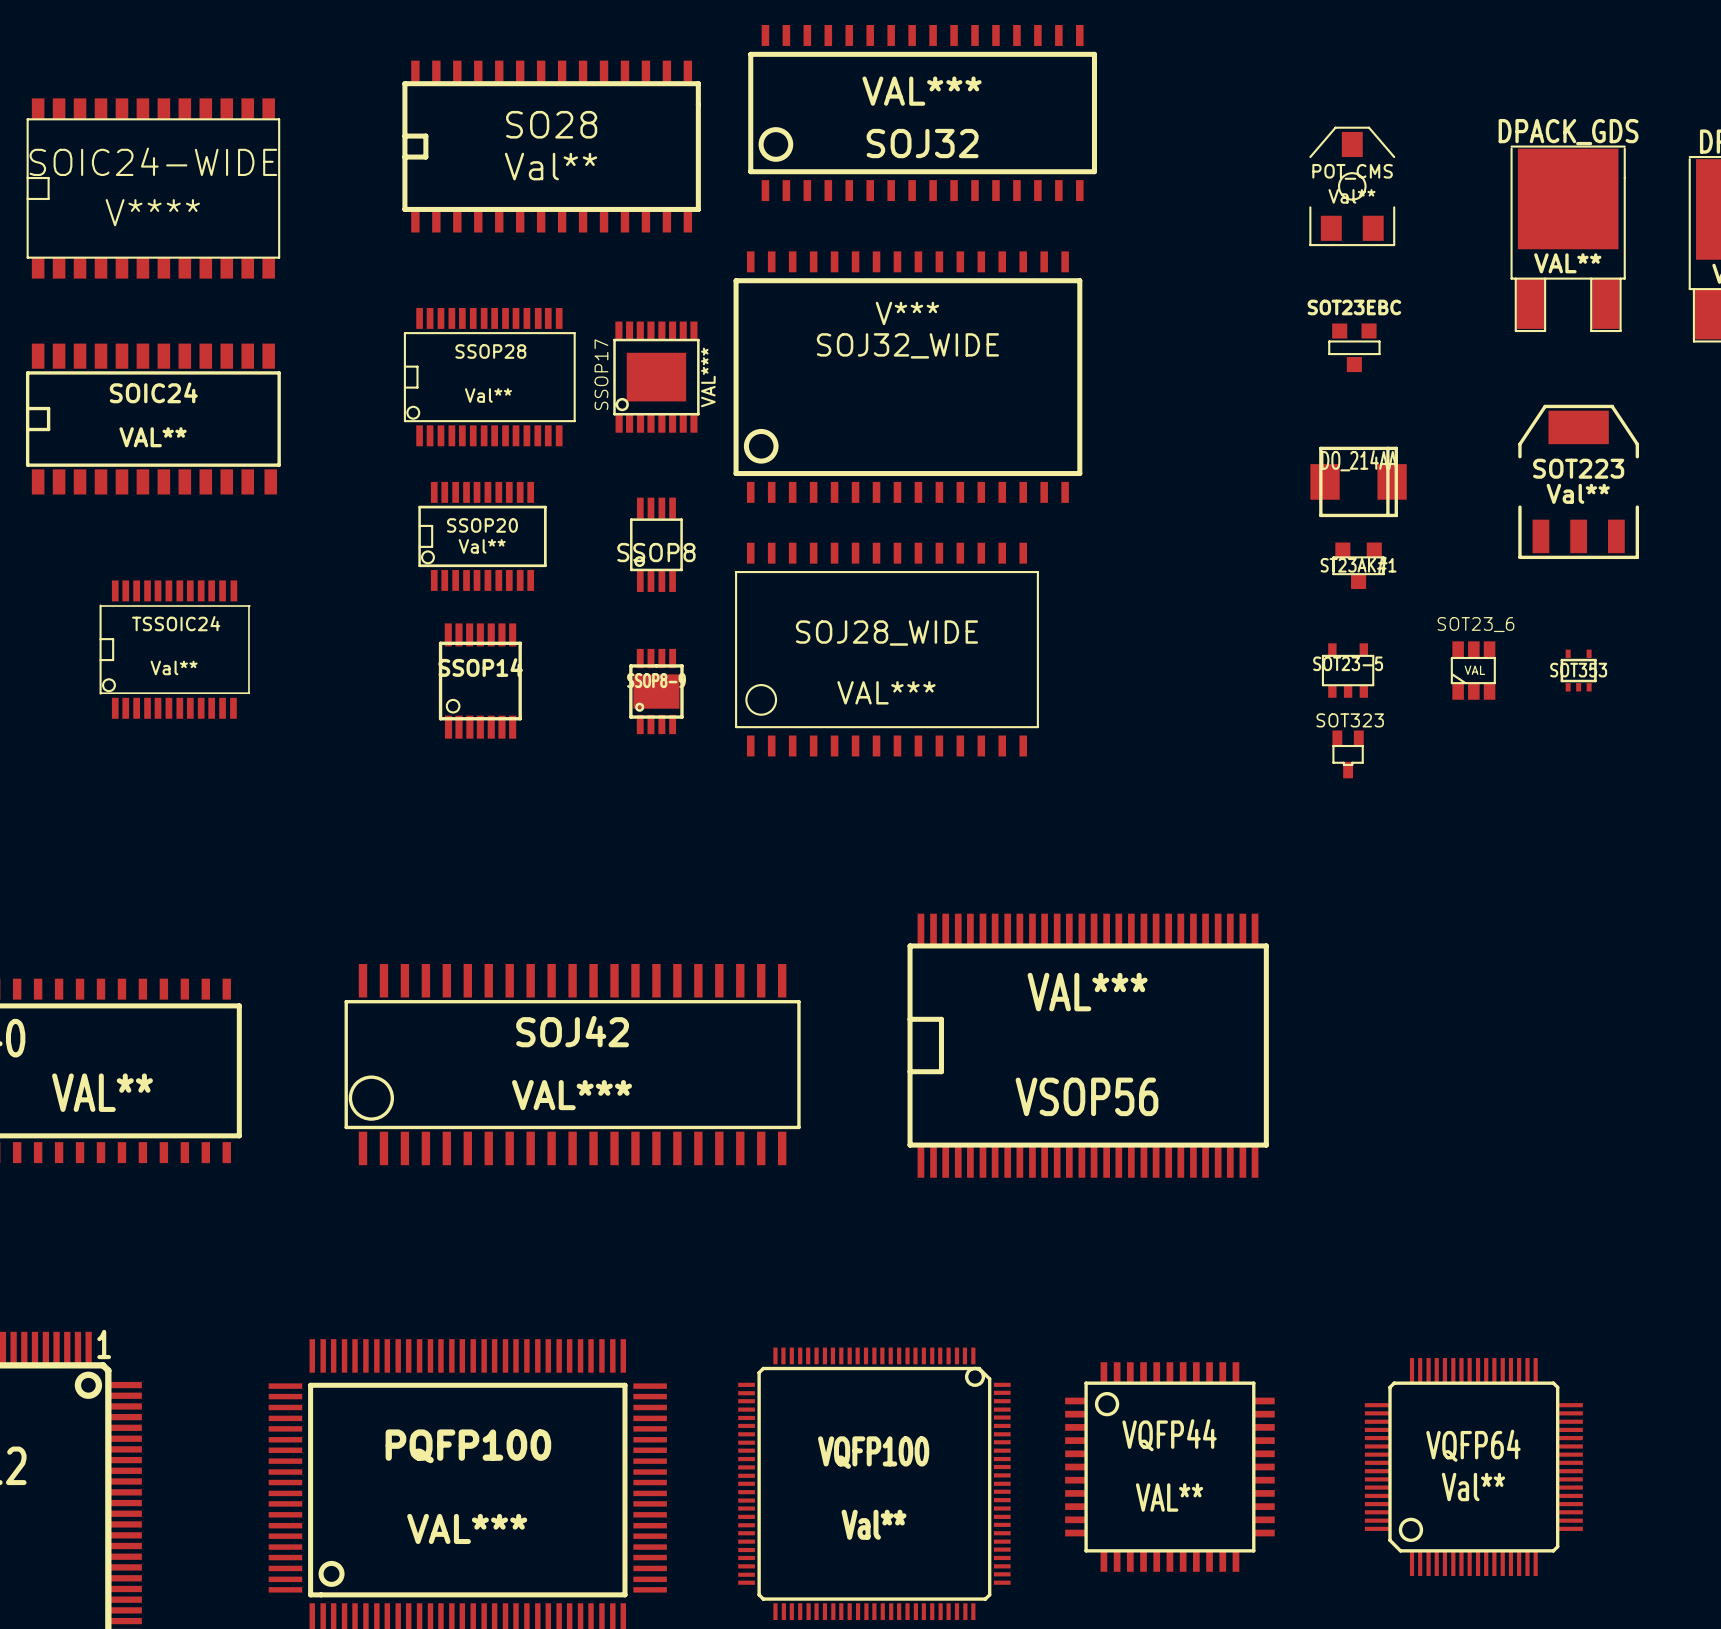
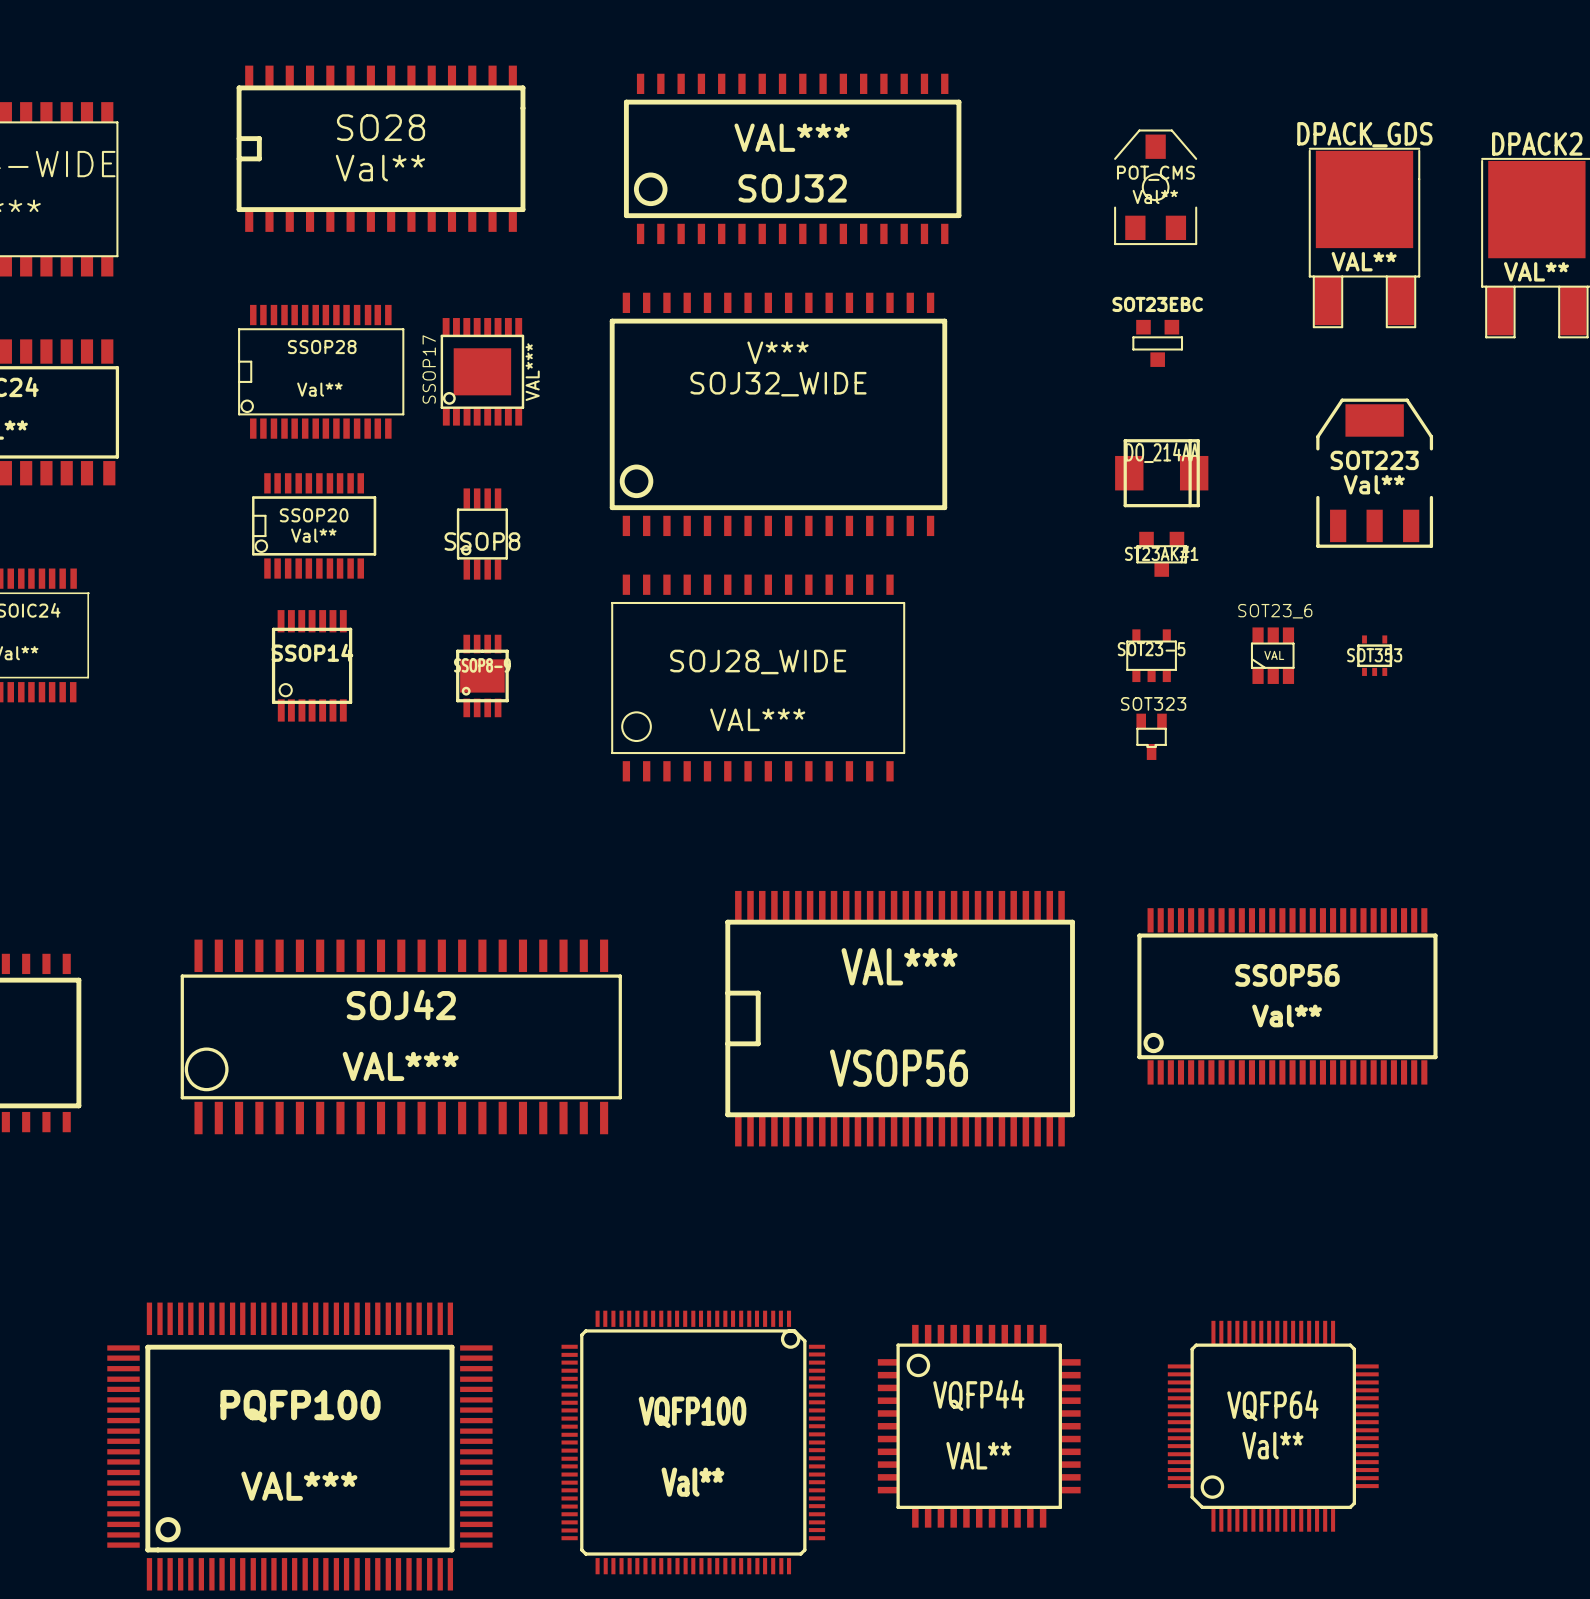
SOJ32 position: (922, 113) -> (792, 158)
SOJ32_WIDE position: (907, 377) -> (778, 414)
SOJ28_WIDE position: (886, 649) -> (758, 678)
SSOP56: none -> Val** (1287, 996)

